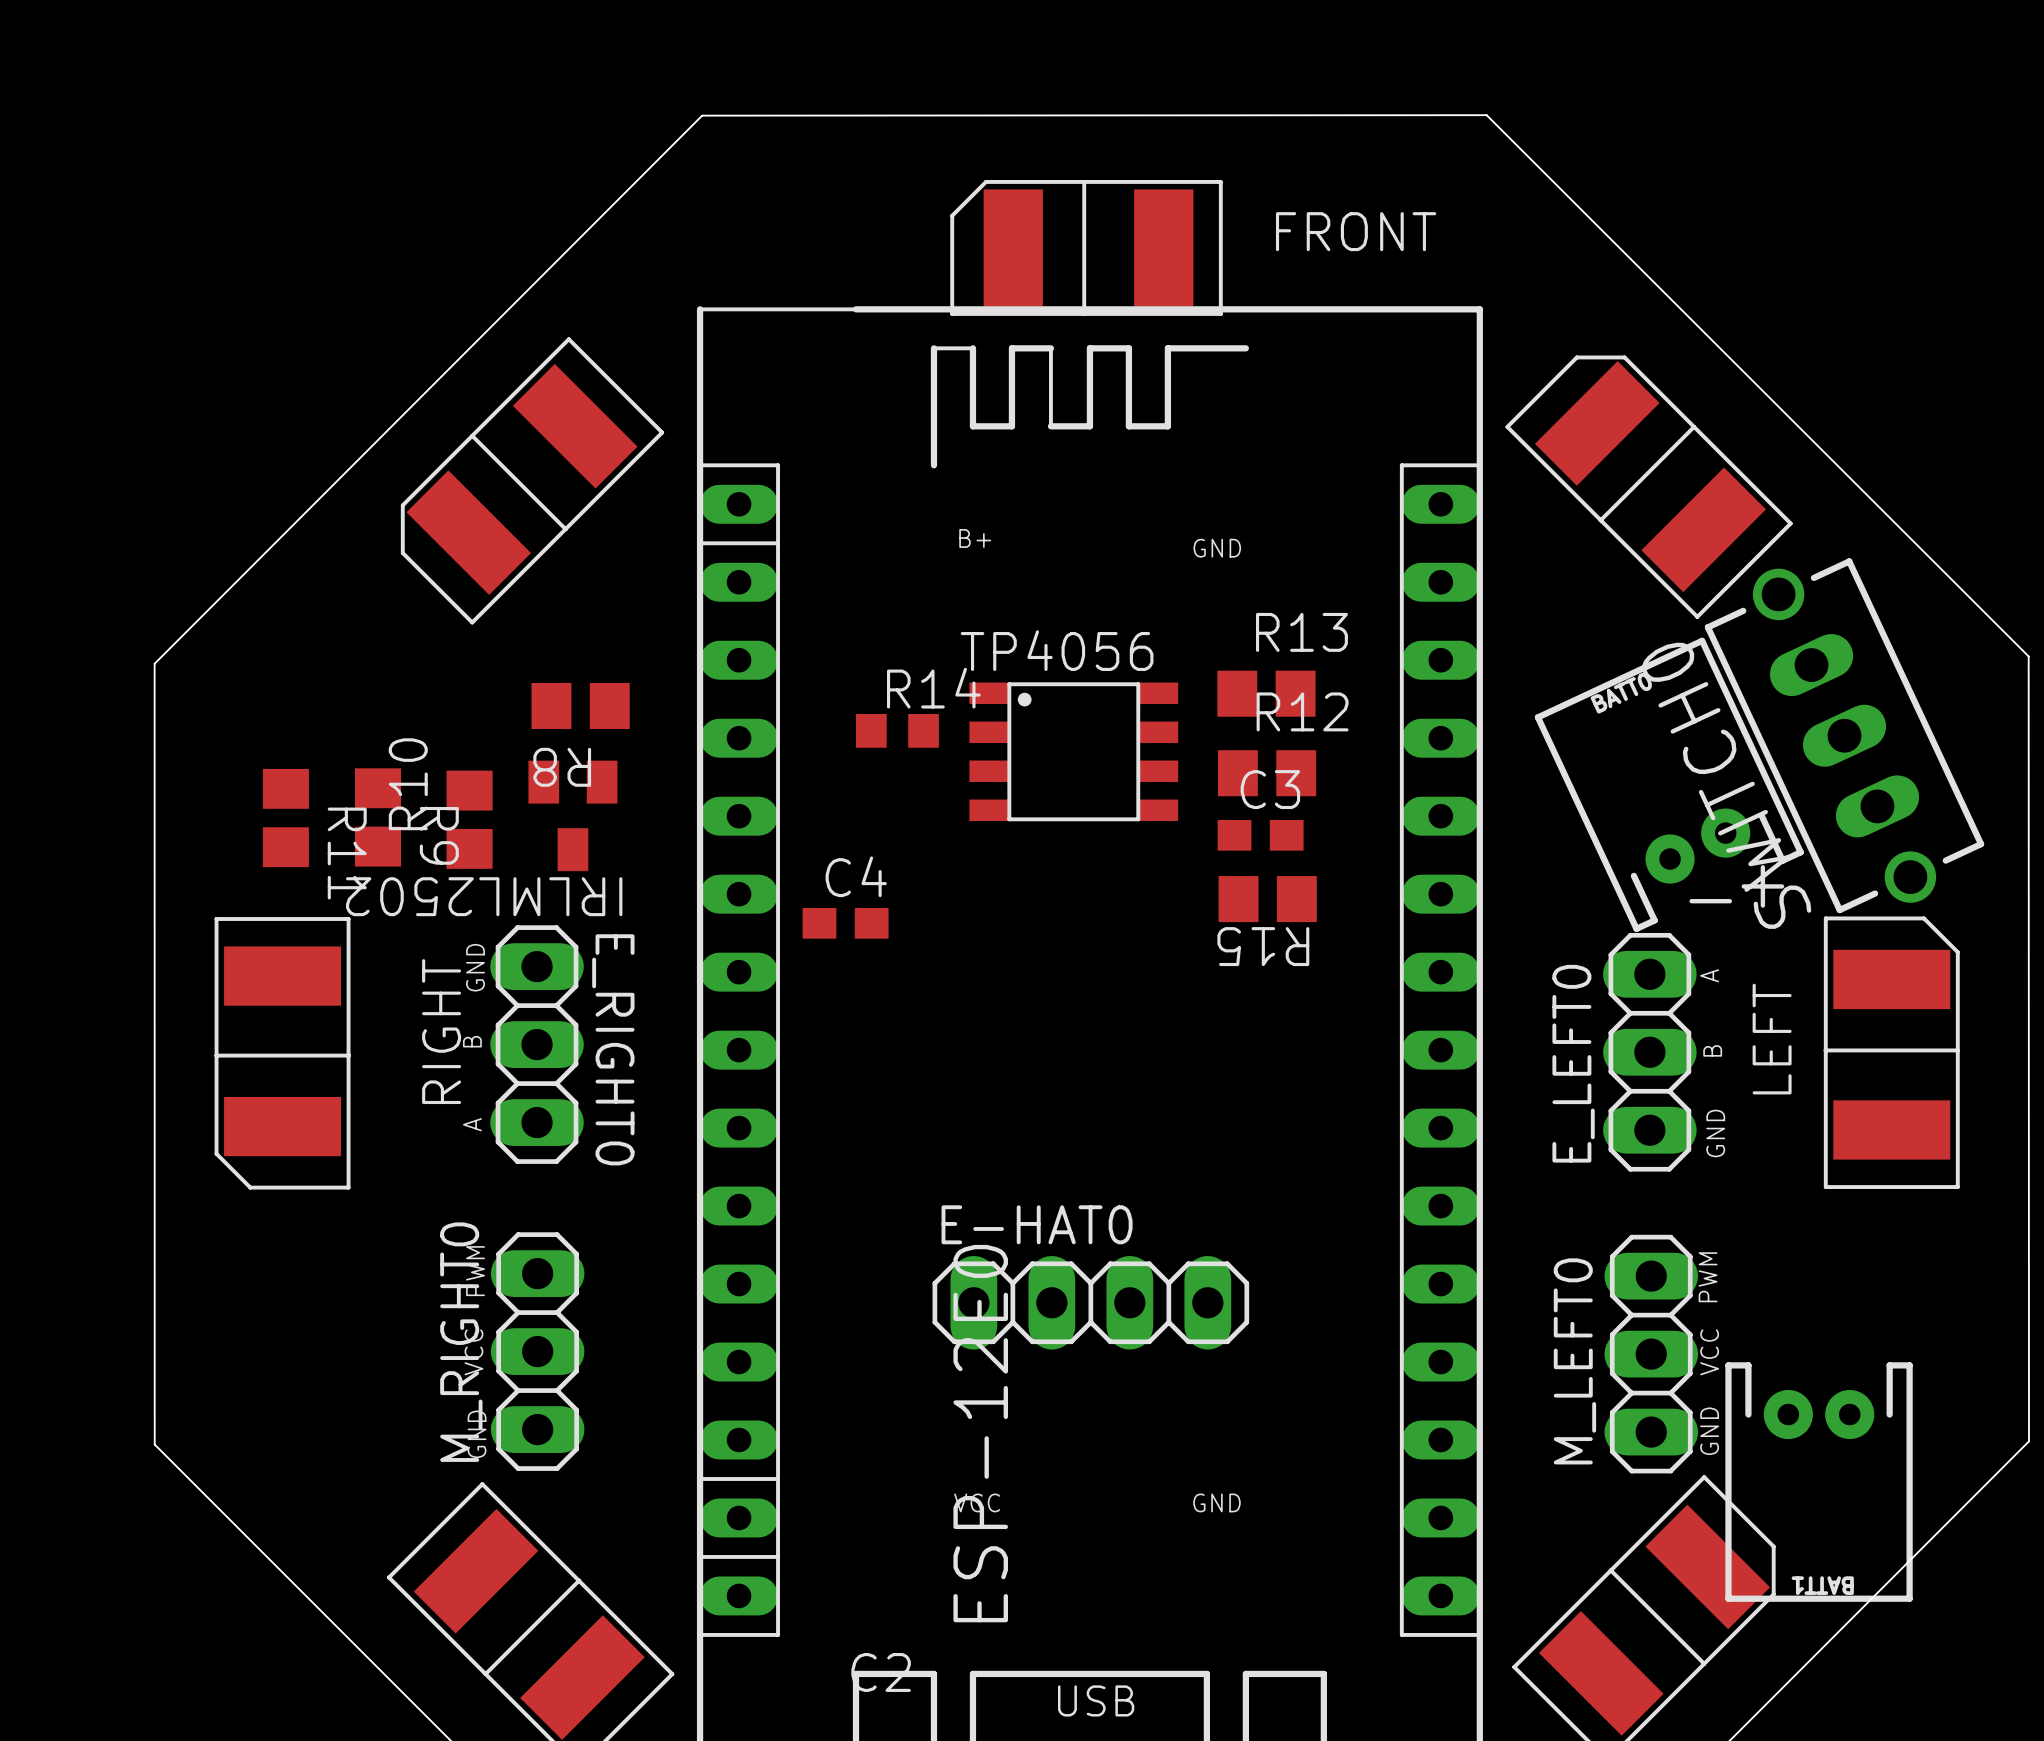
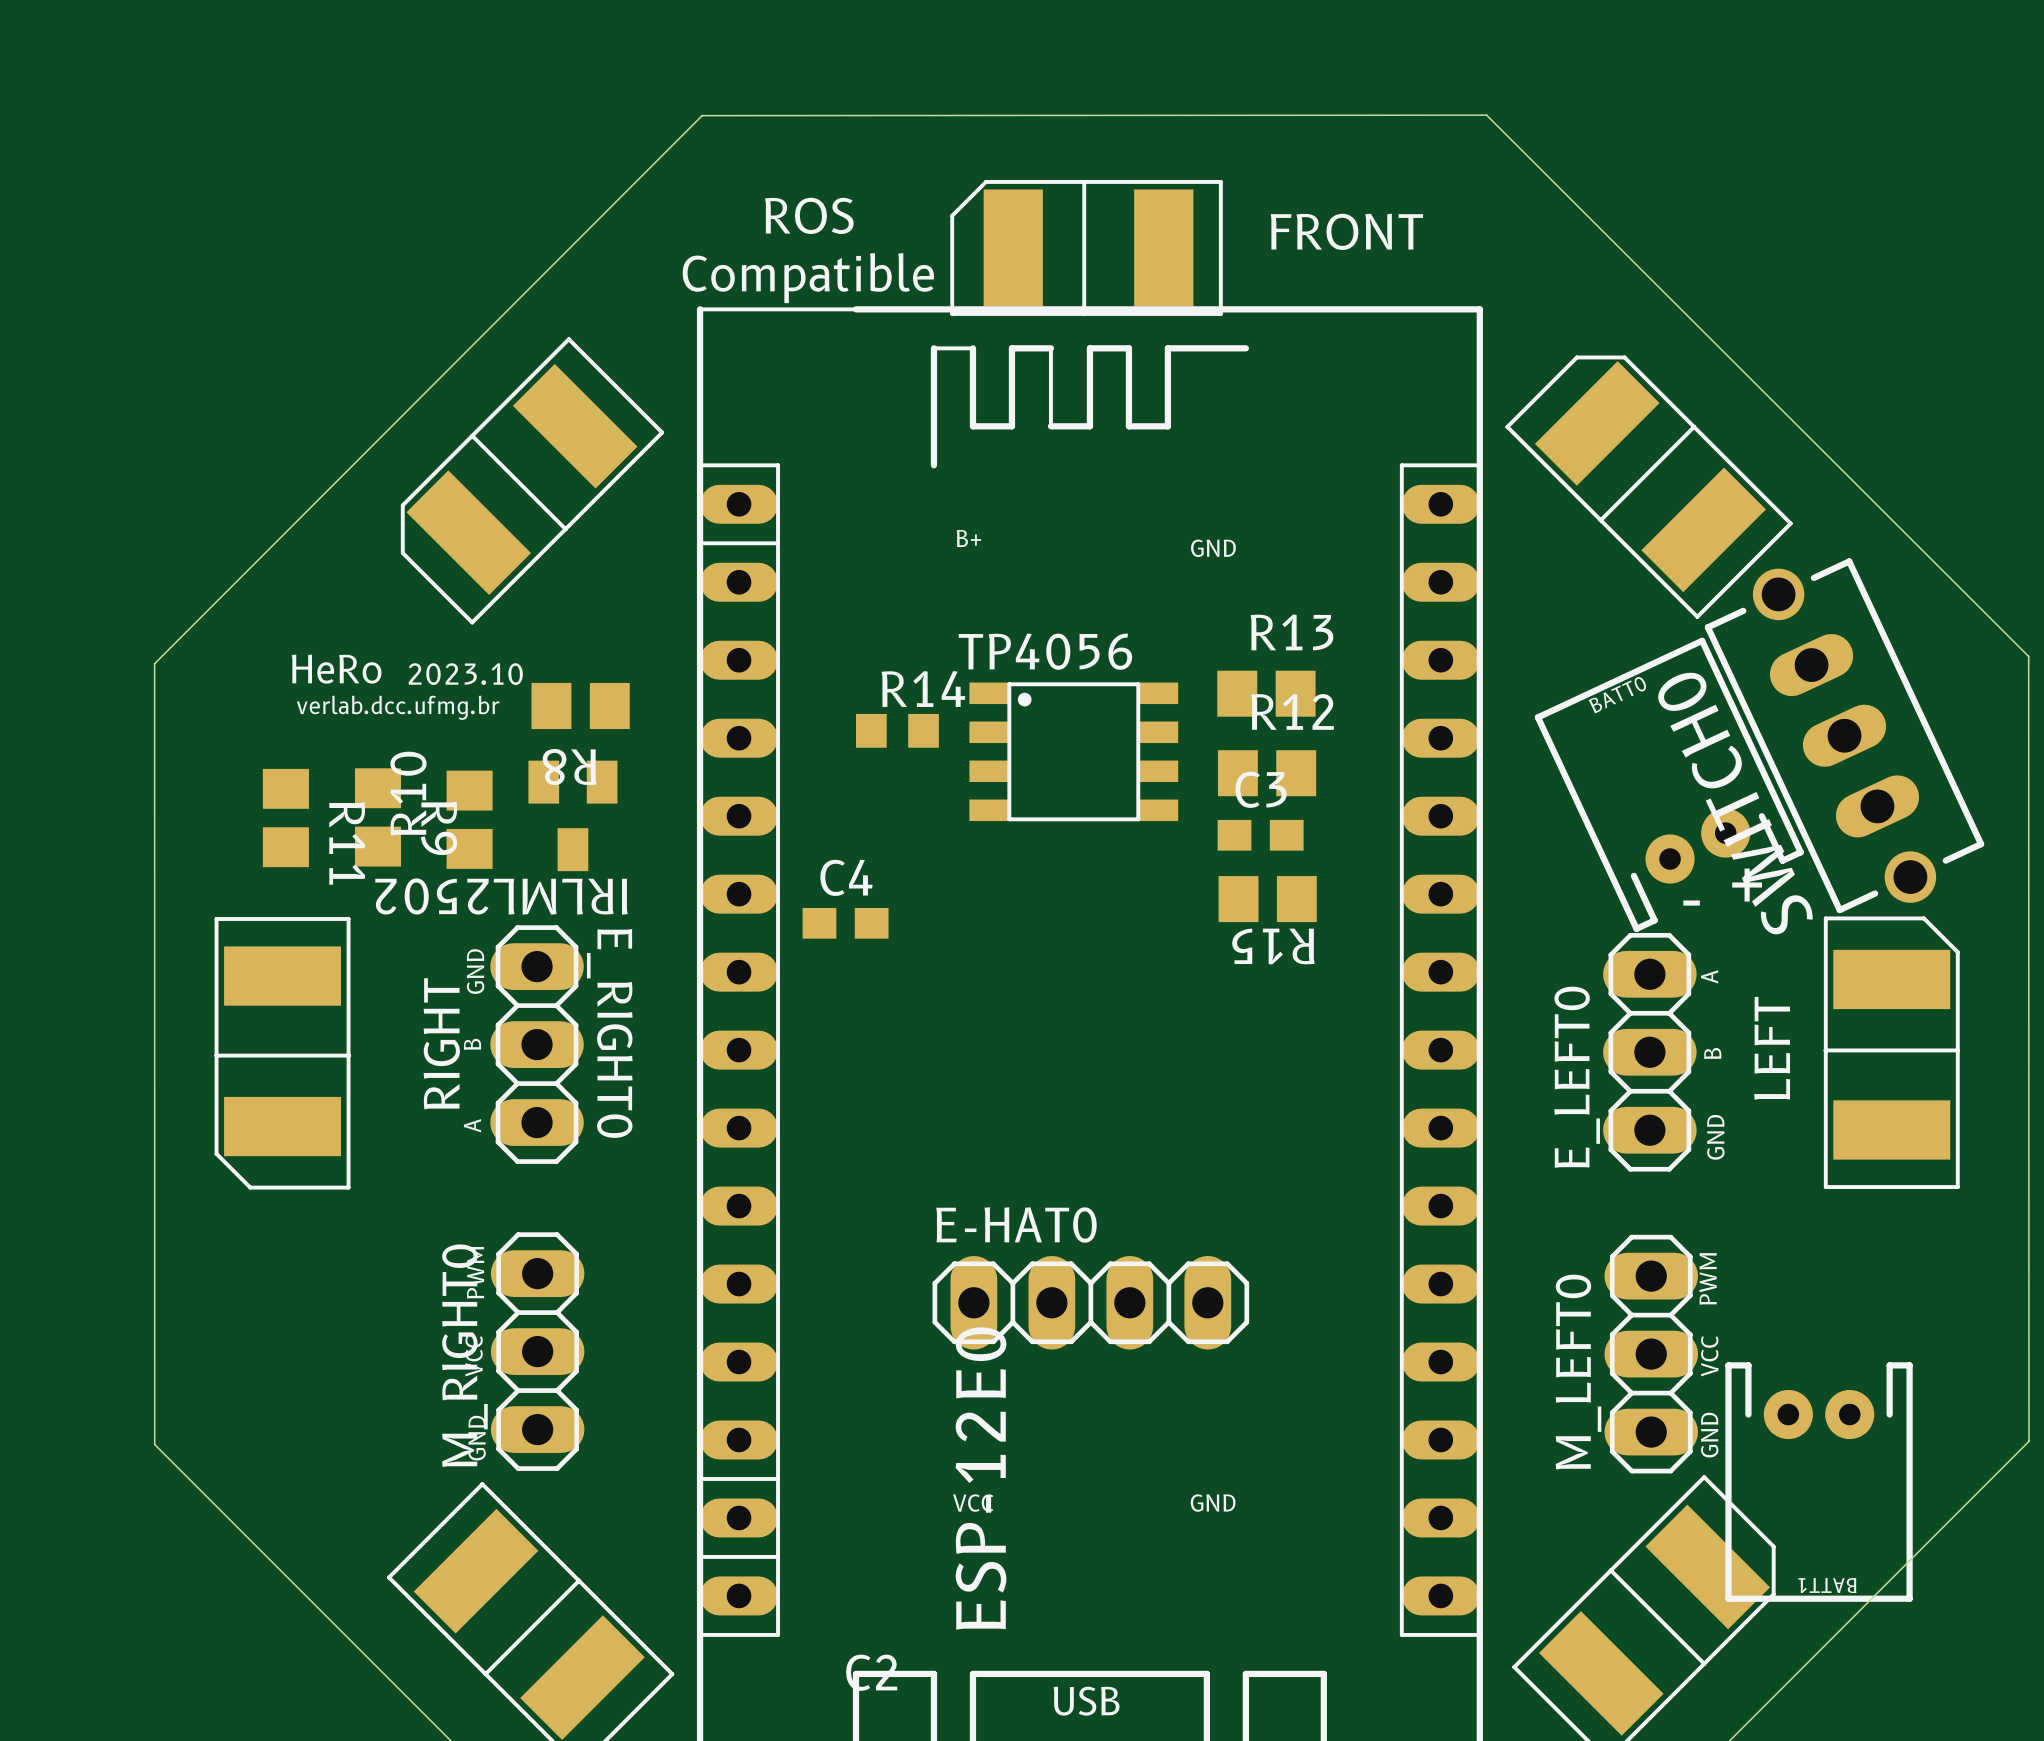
text: none -> ROS (809, 215)
text: none -> Compatible (808, 278)
text: none -> HeRo (336, 669)
text: none -> 2023.10 (465, 674)
text: none -> verlab.dcc.ufmg.br (398, 707)

